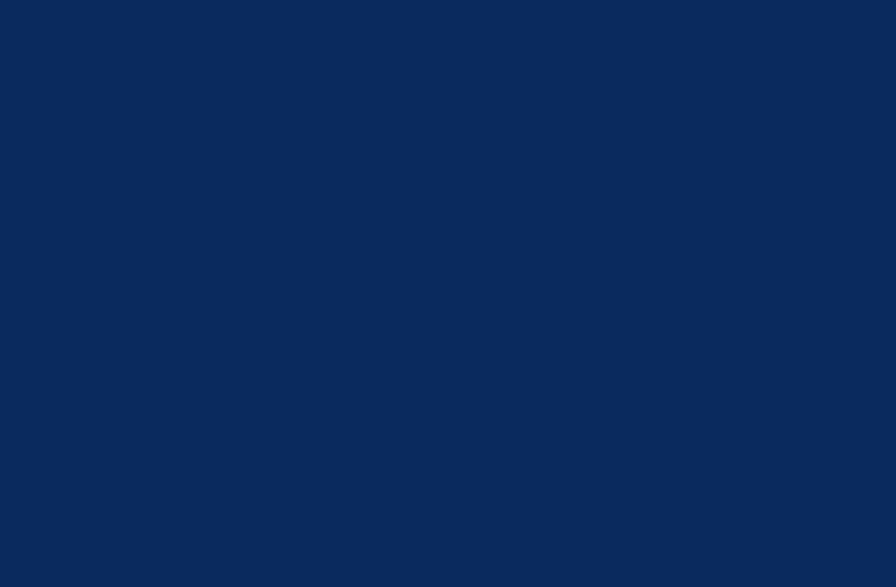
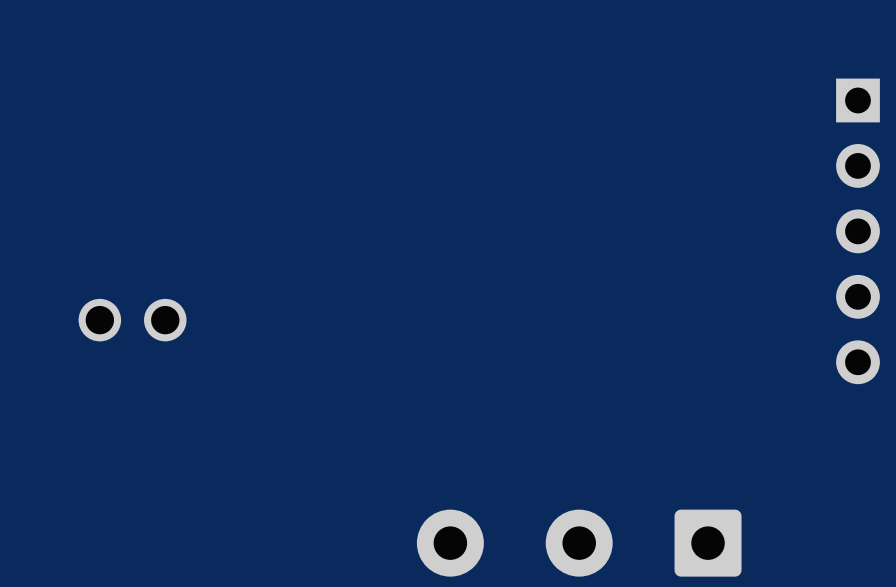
part: none -> (857, 231)
part: none -> (132, 320)
part: none -> (579, 543)

